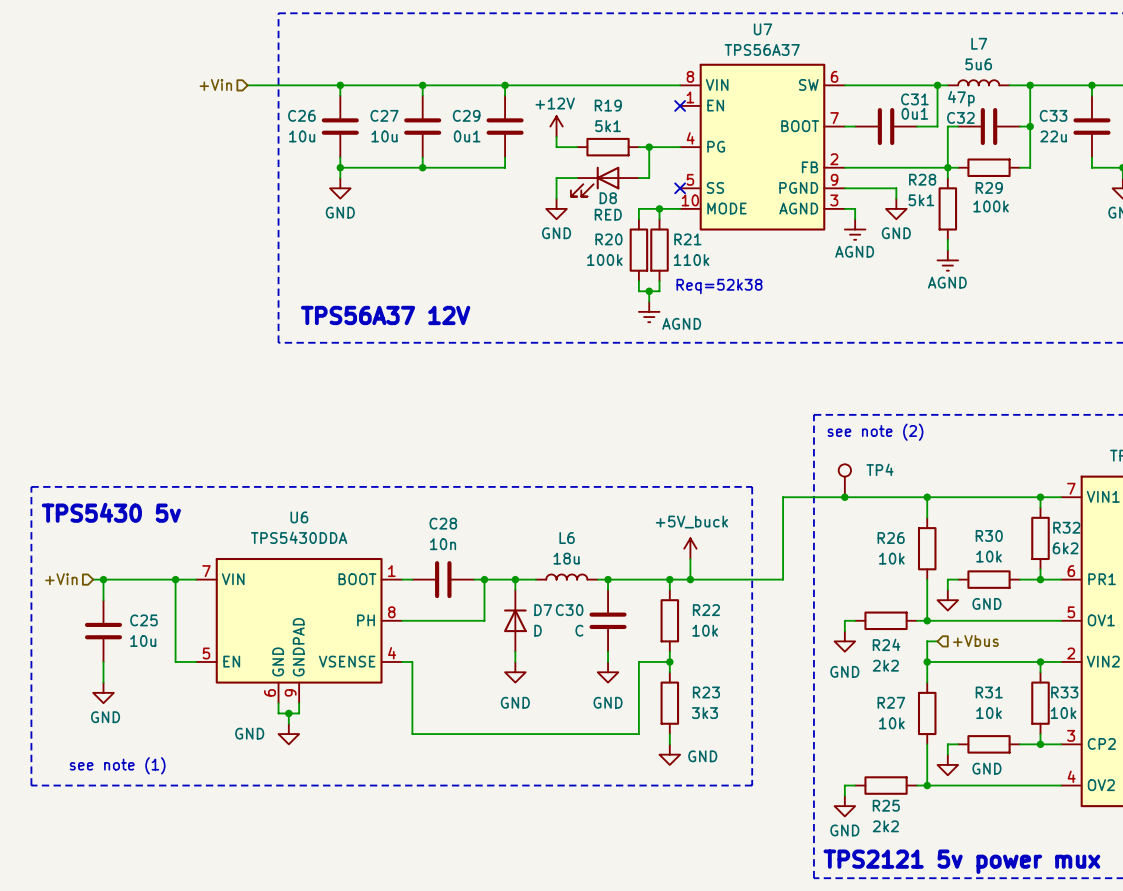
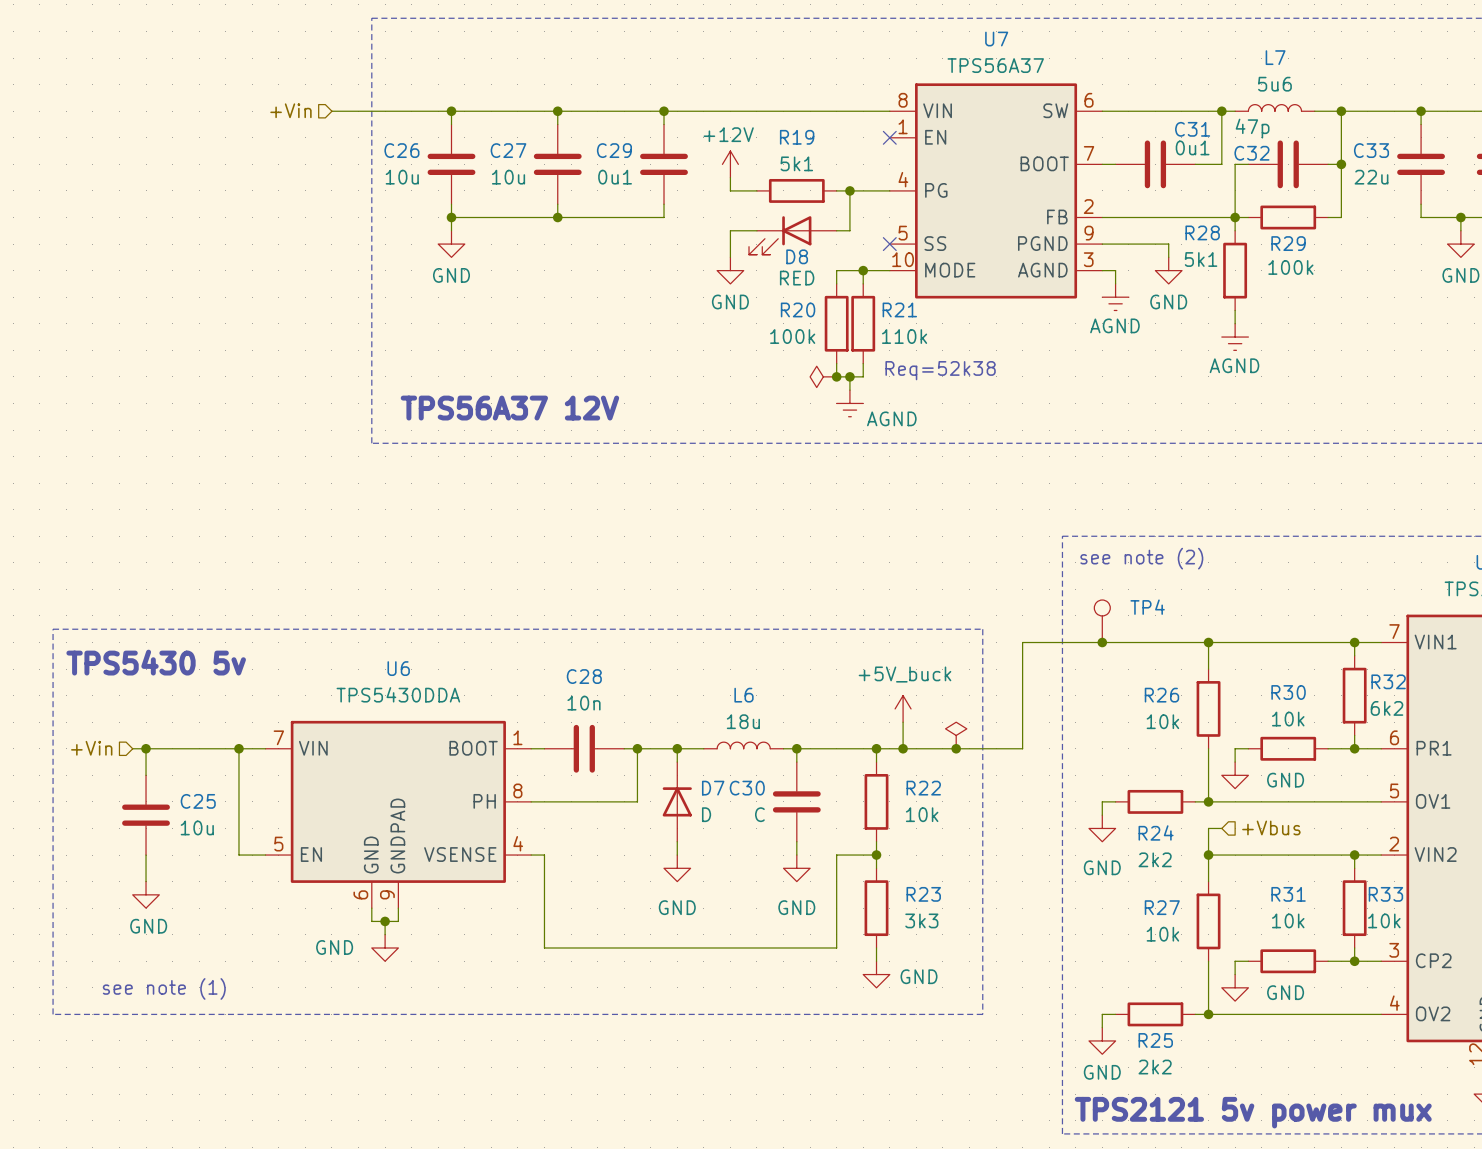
power symbol: none -> (823, 376)
junction: none -> (836, 376)
power symbol: none -> (956, 735)
junction: none -> (956, 748)

